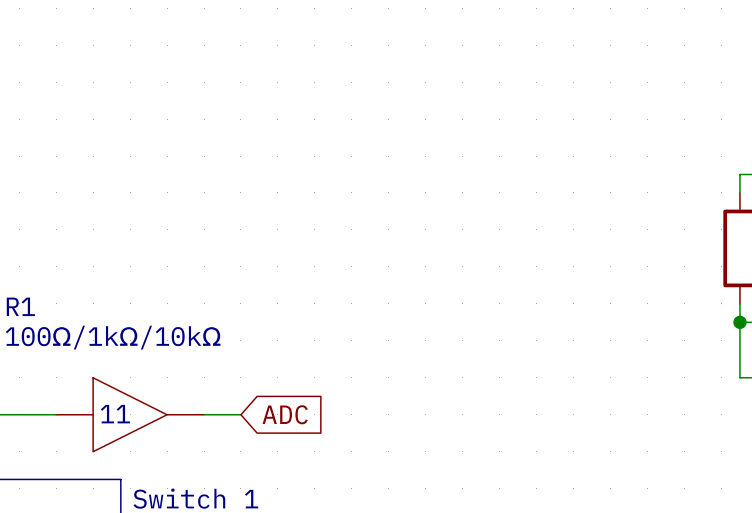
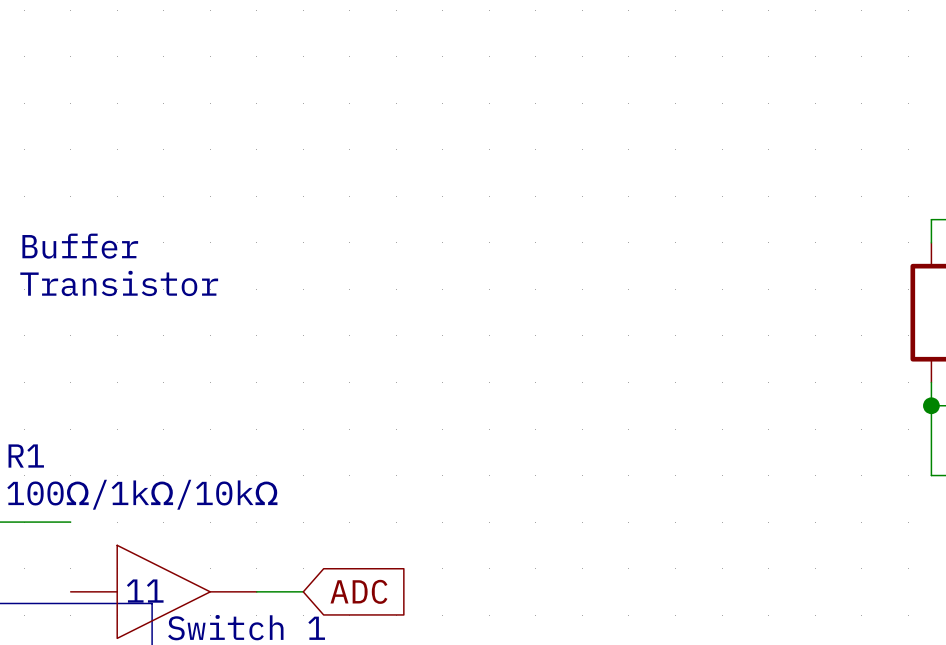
text: none -> Buffer (80, 246)
text: none -> Transistor (119, 283)
text position: R1 (20, 306) -> R1 (26, 456)
text position: 100Ω/1kΩ/10kΩ (113, 337) -> 100Ω/1kΩ/10kΩ (142, 494)
text position: 11 (115, 414) -> 11 (145, 591)
part position: (130, 414) -> (163, 591)
wire: (204, 414) (240, 414) -> (256, 591) (303, 591)
global label position: ADC (285, 414) -> ADC (358, 591)

